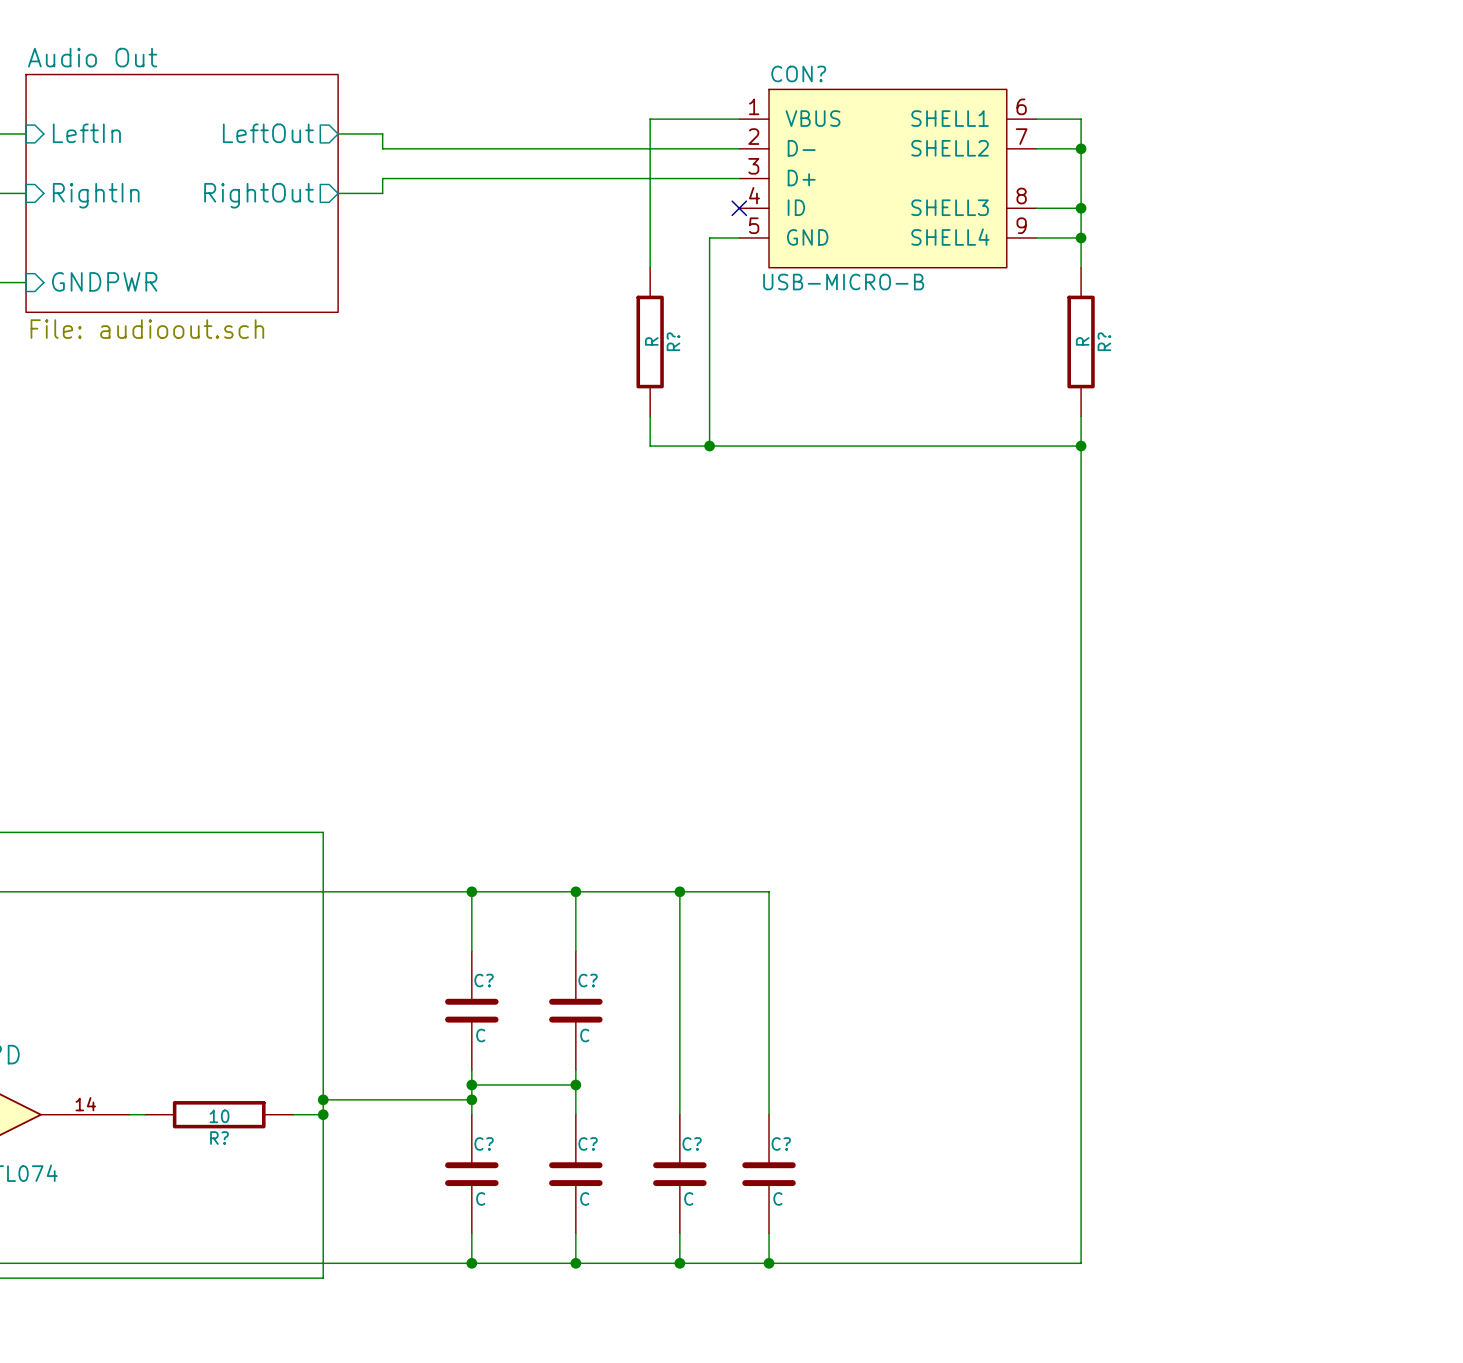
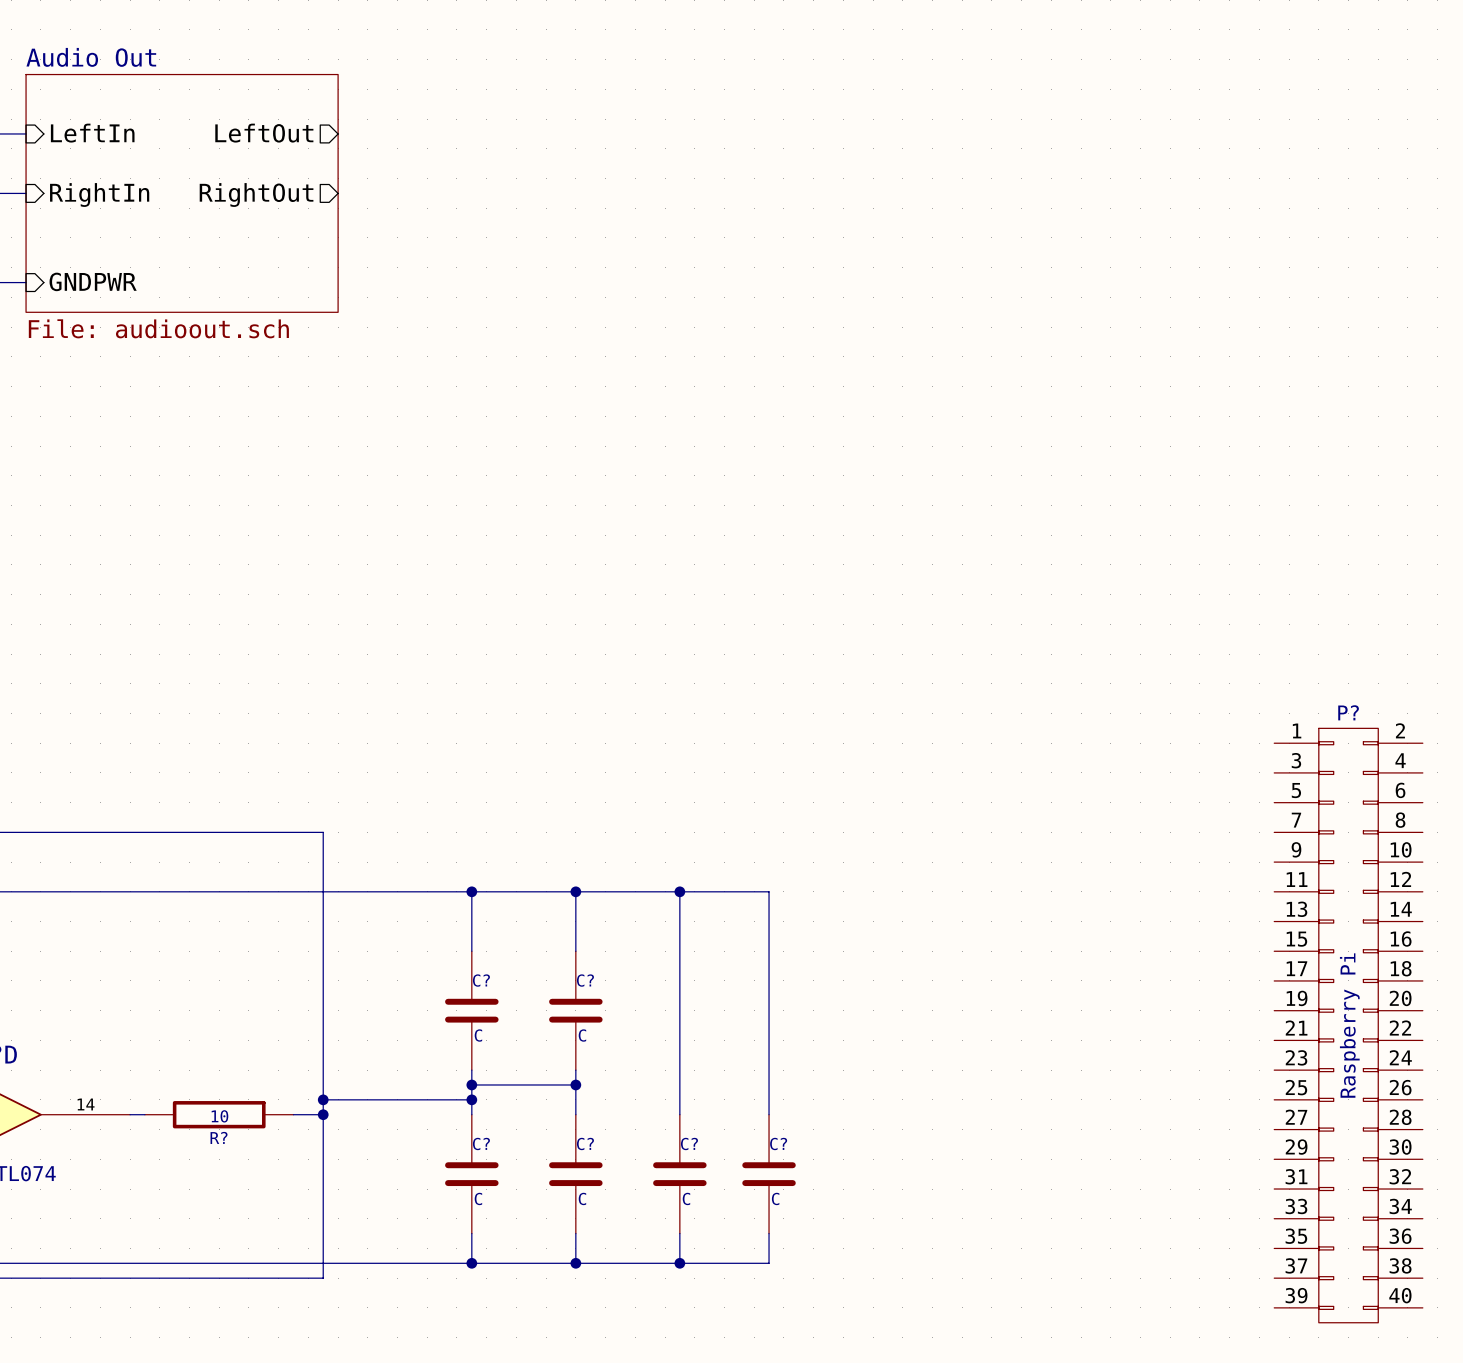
wire: (739, 119) (650, 119) (650, 267) -> none
wire: (1036, 119) (1081, 119) (1081, 267) -> none
wire: (338, 133) (382, 133) (382, 148) (739, 148) -> none
wire: (1036, 148) (1081, 148) -> none
junction: (1081, 148) -> none
wire: (739, 178) (382, 178) (382, 193) (338, 193) -> none
CON?: USB-MICRO-B (887, 178) -> none
no-connect mark: (739, 208) -> none
wire: (1036, 208) (1081, 208) -> none
junction: (1081, 208) -> none
wire: (739, 237) (709, 237) (709, 446) -> none
wire: (1036, 237) (1081, 237) -> none
junction: (1081, 237) -> none
R?: R (650, 342) -> none
R?: R (1081, 342) -> none
wire: (650, 416) (650, 446) (1081, 446) -> none
wire: (1081, 416) (1081, 1263) (769, 1263) -> none
junction: (709, 446) -> none
junction: (1081, 446) -> none
P?: none -> Raspberry Pi (1348, 1025)
junction: (769, 1263) -> none

